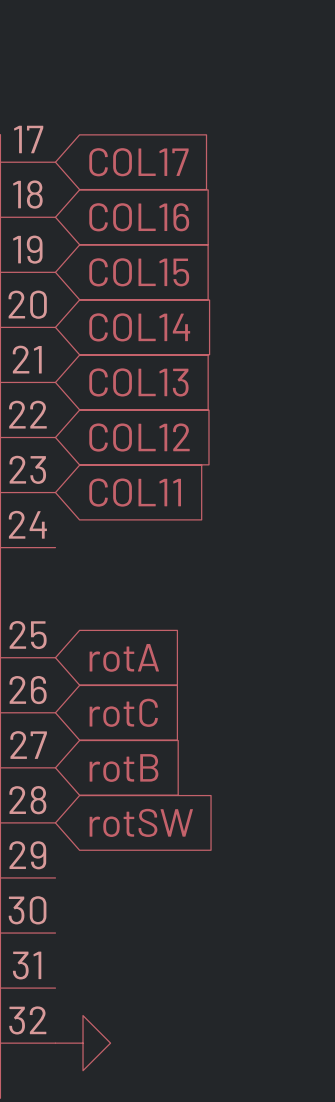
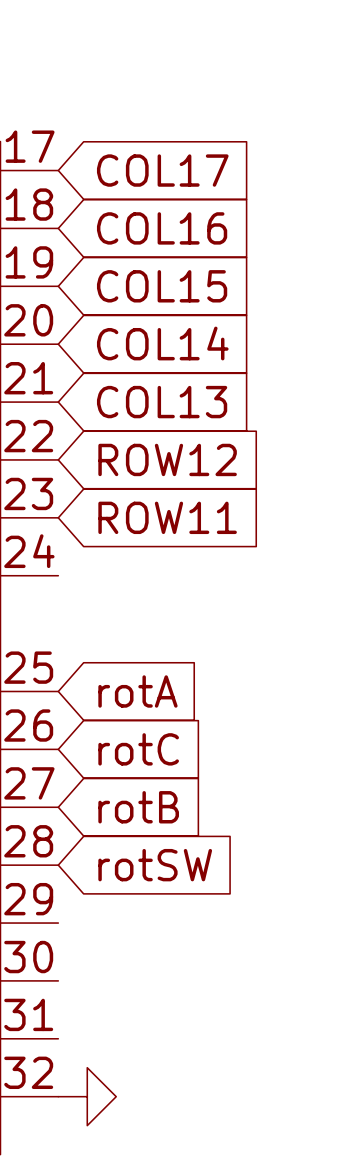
global label: COL12 (139, 437) -> ROW12 (167, 459)
global label: COL11 (135, 492) -> ROW11 (167, 517)

